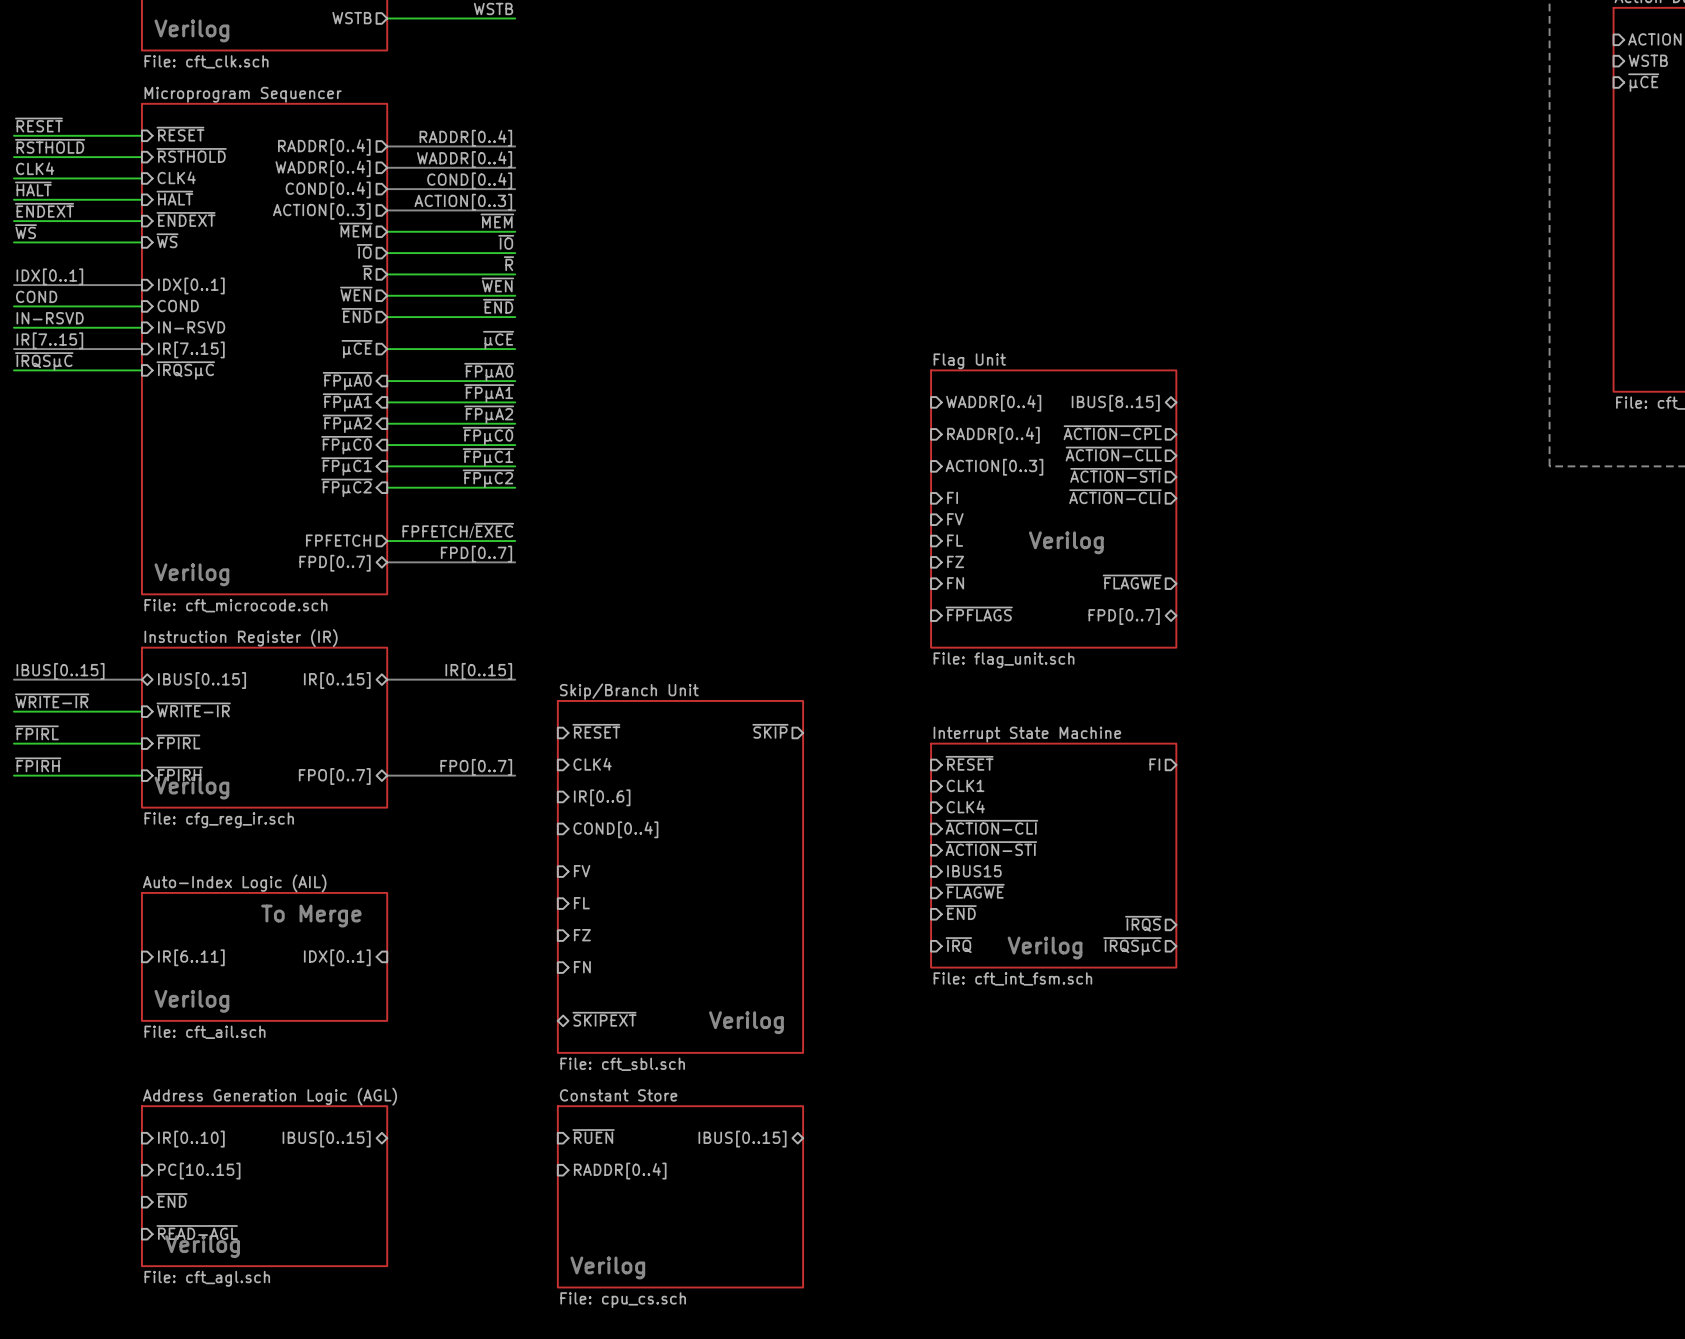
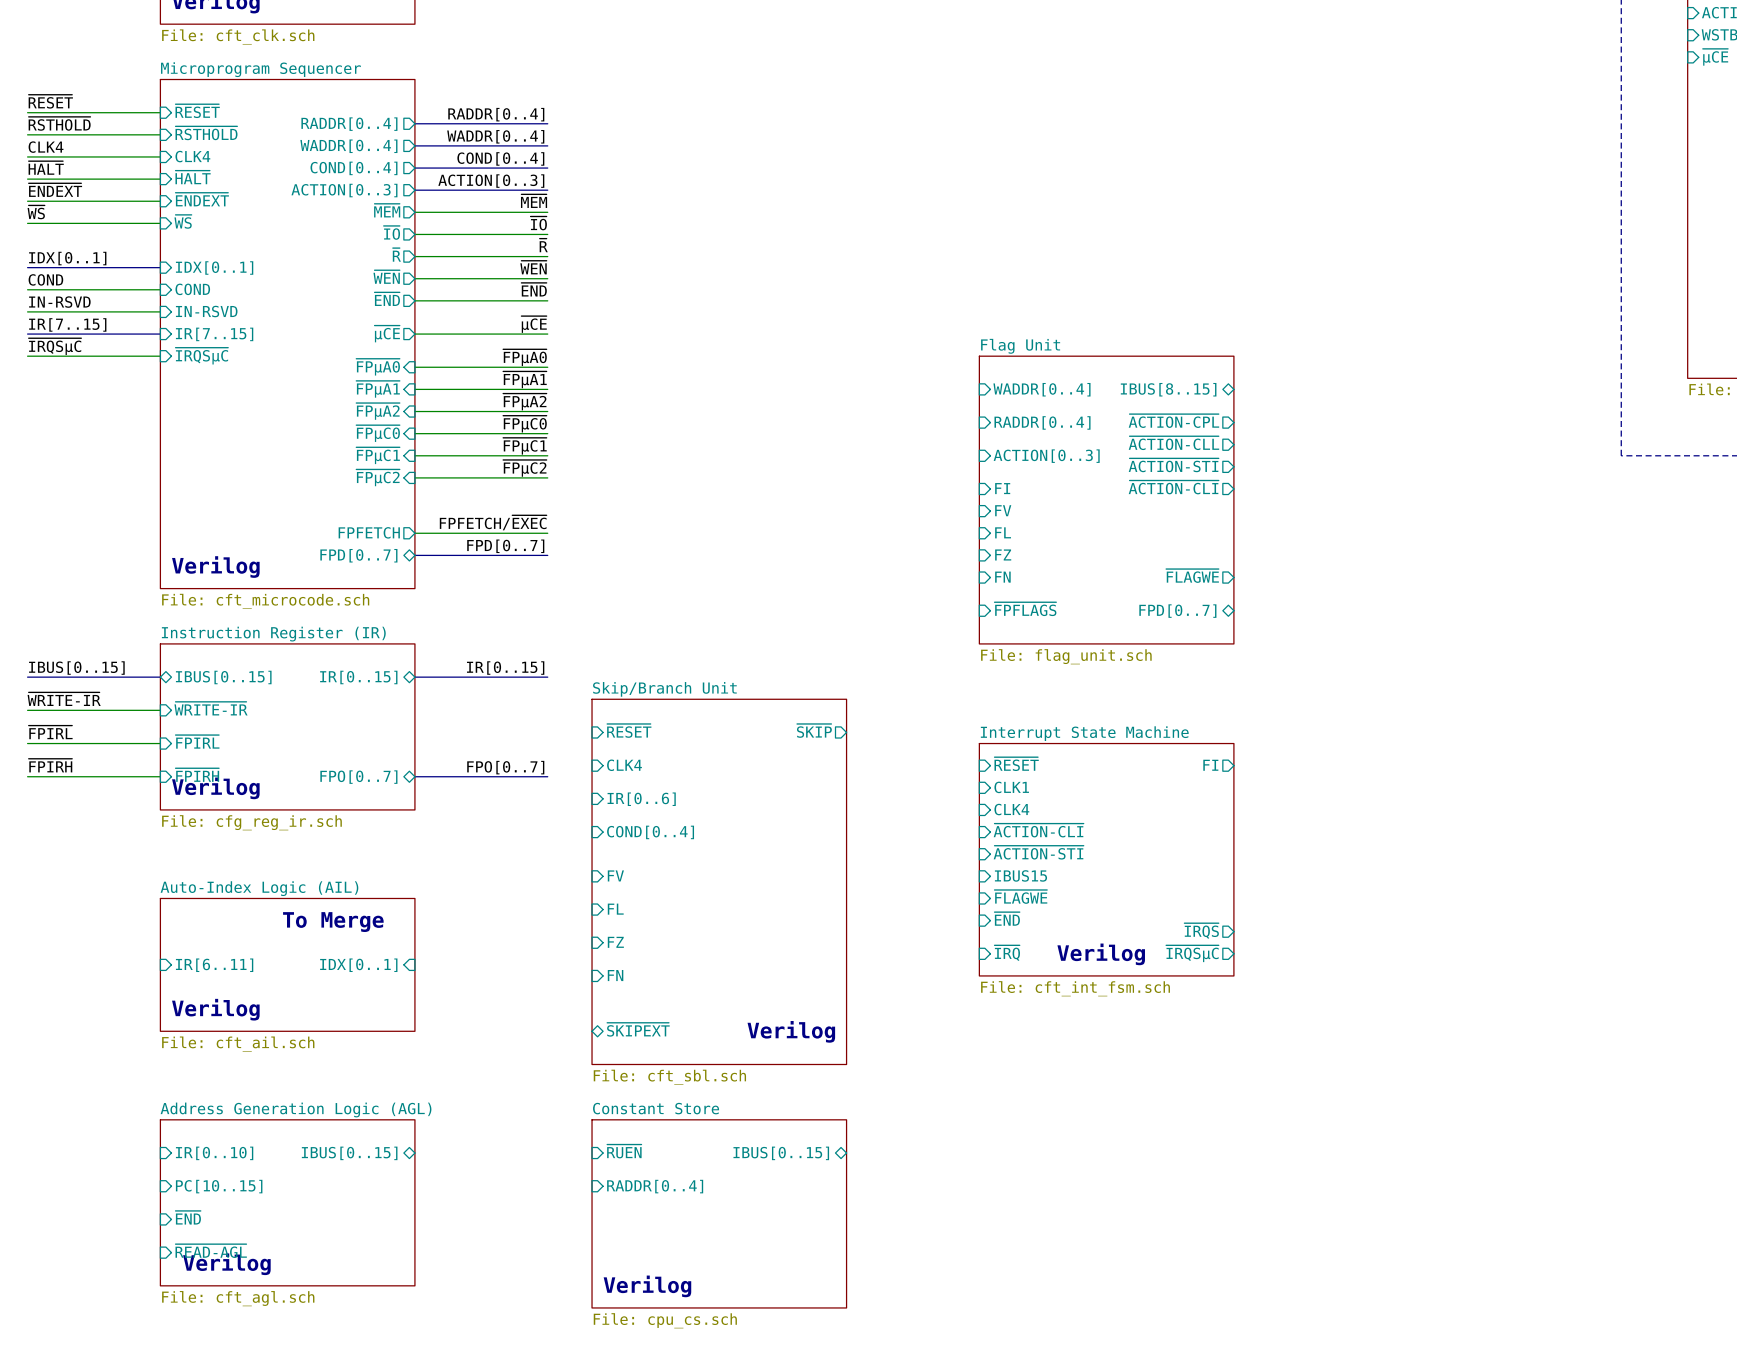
text: Verilog (1066, 542) -> none

